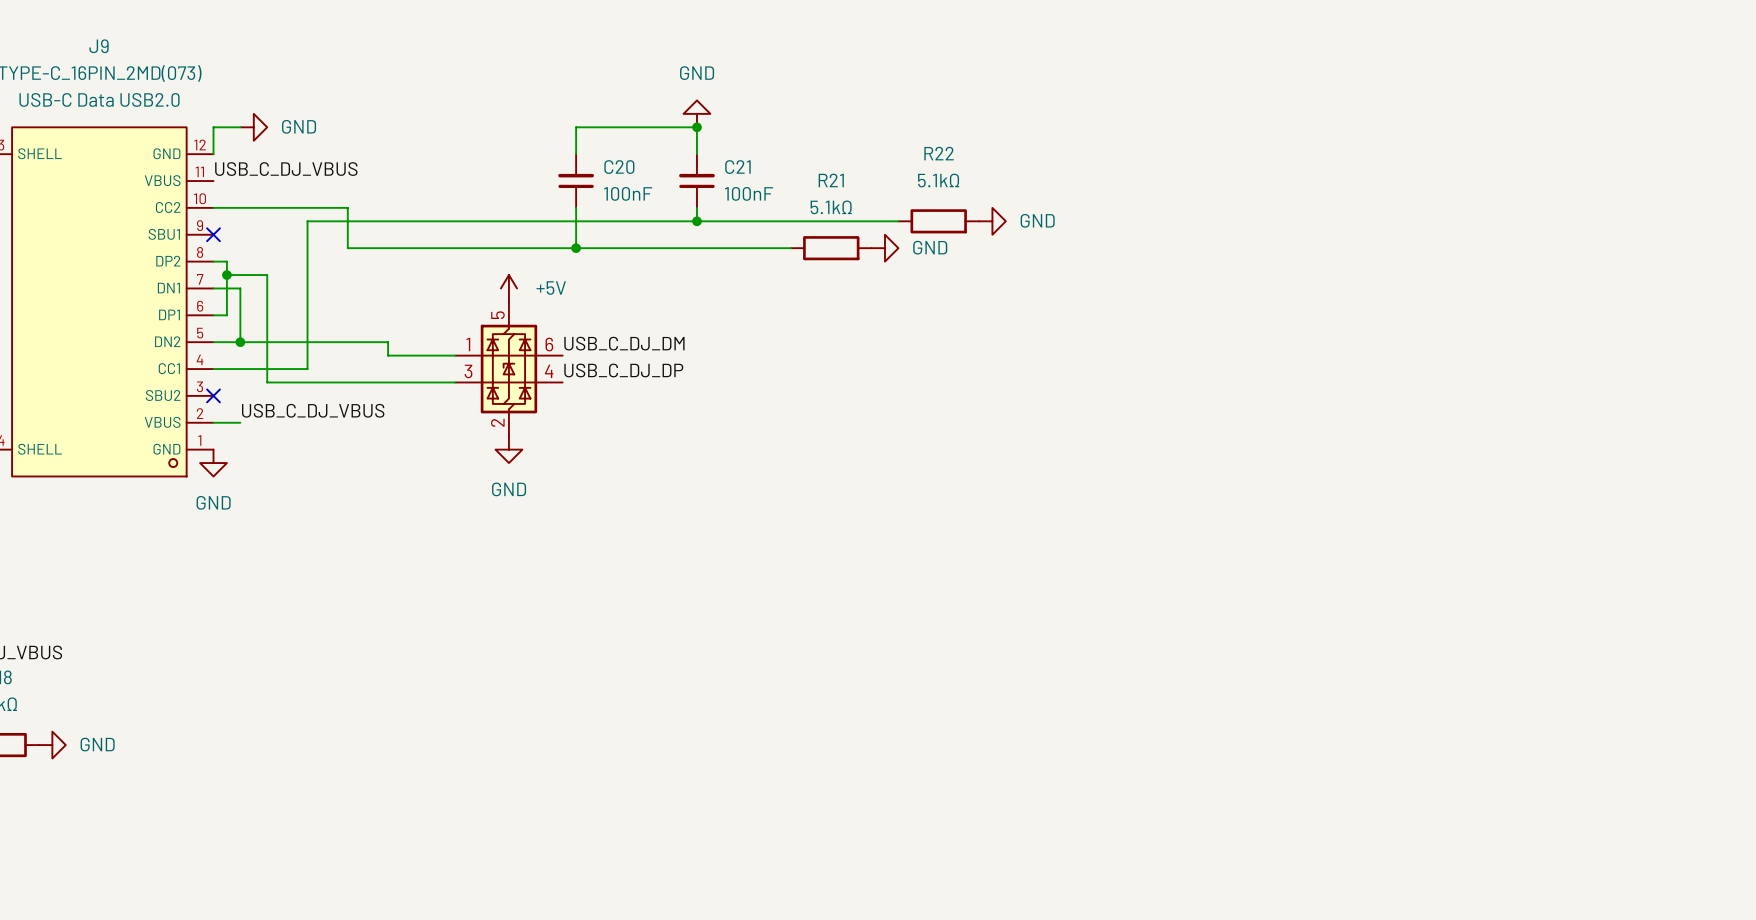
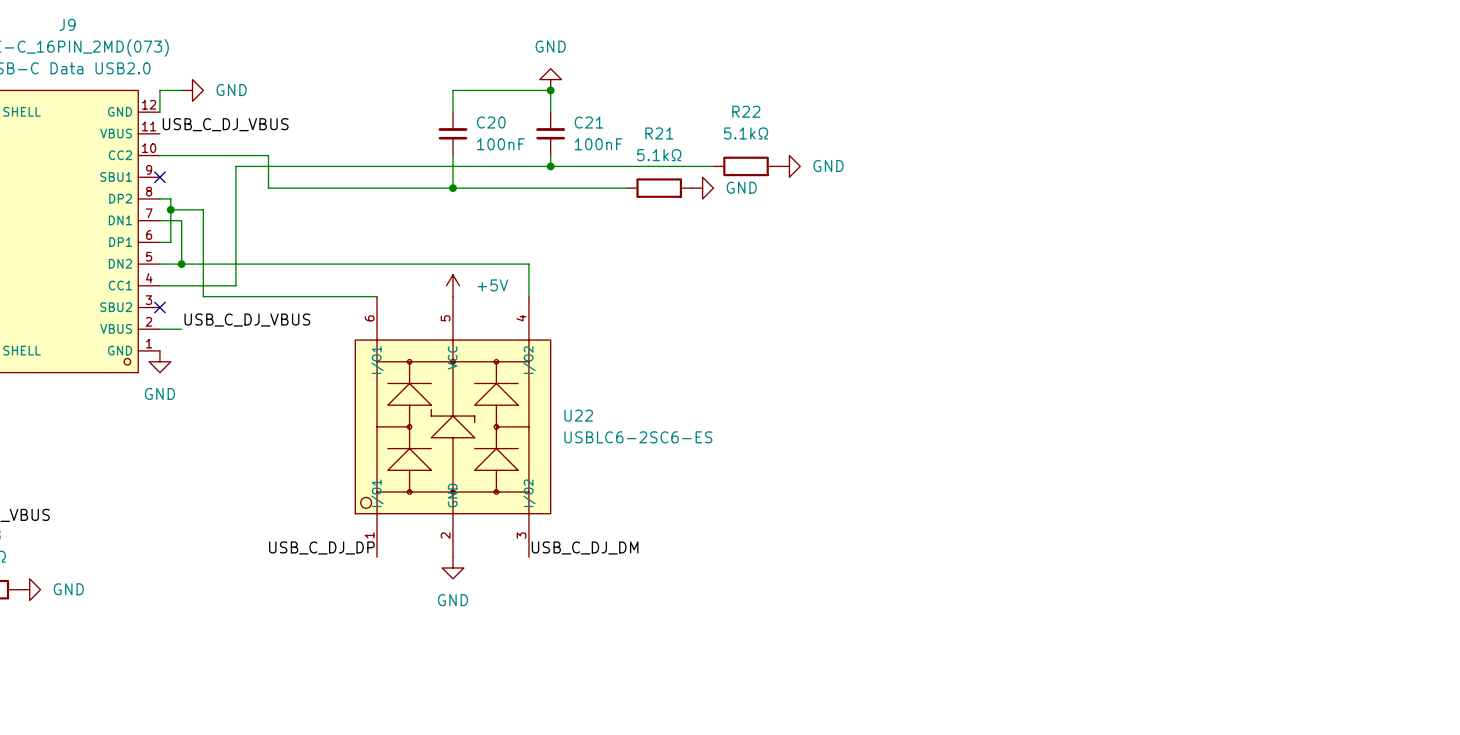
power symbol position: +5V (508, 288) -> +5V (452, 285)
wire: (388, 342) (388, 355) (455, 355) -> (301, 264) (528, 264) (528, 296)
label: USB_C_DJ_DM (624, 343) -> none
part: (508, 369) -> none
label: USB_C_DJ_DP (623, 370) -> none
power symbol: GND (508, 449) -> none
U22: none -> USBLC6-2SC6-ES (452, 426)
label: none -> USB_C_DJ_DP (321, 547)
label: none -> USB_C_DJ_DM (585, 547)
power symbol: none -> GND (452, 567)

